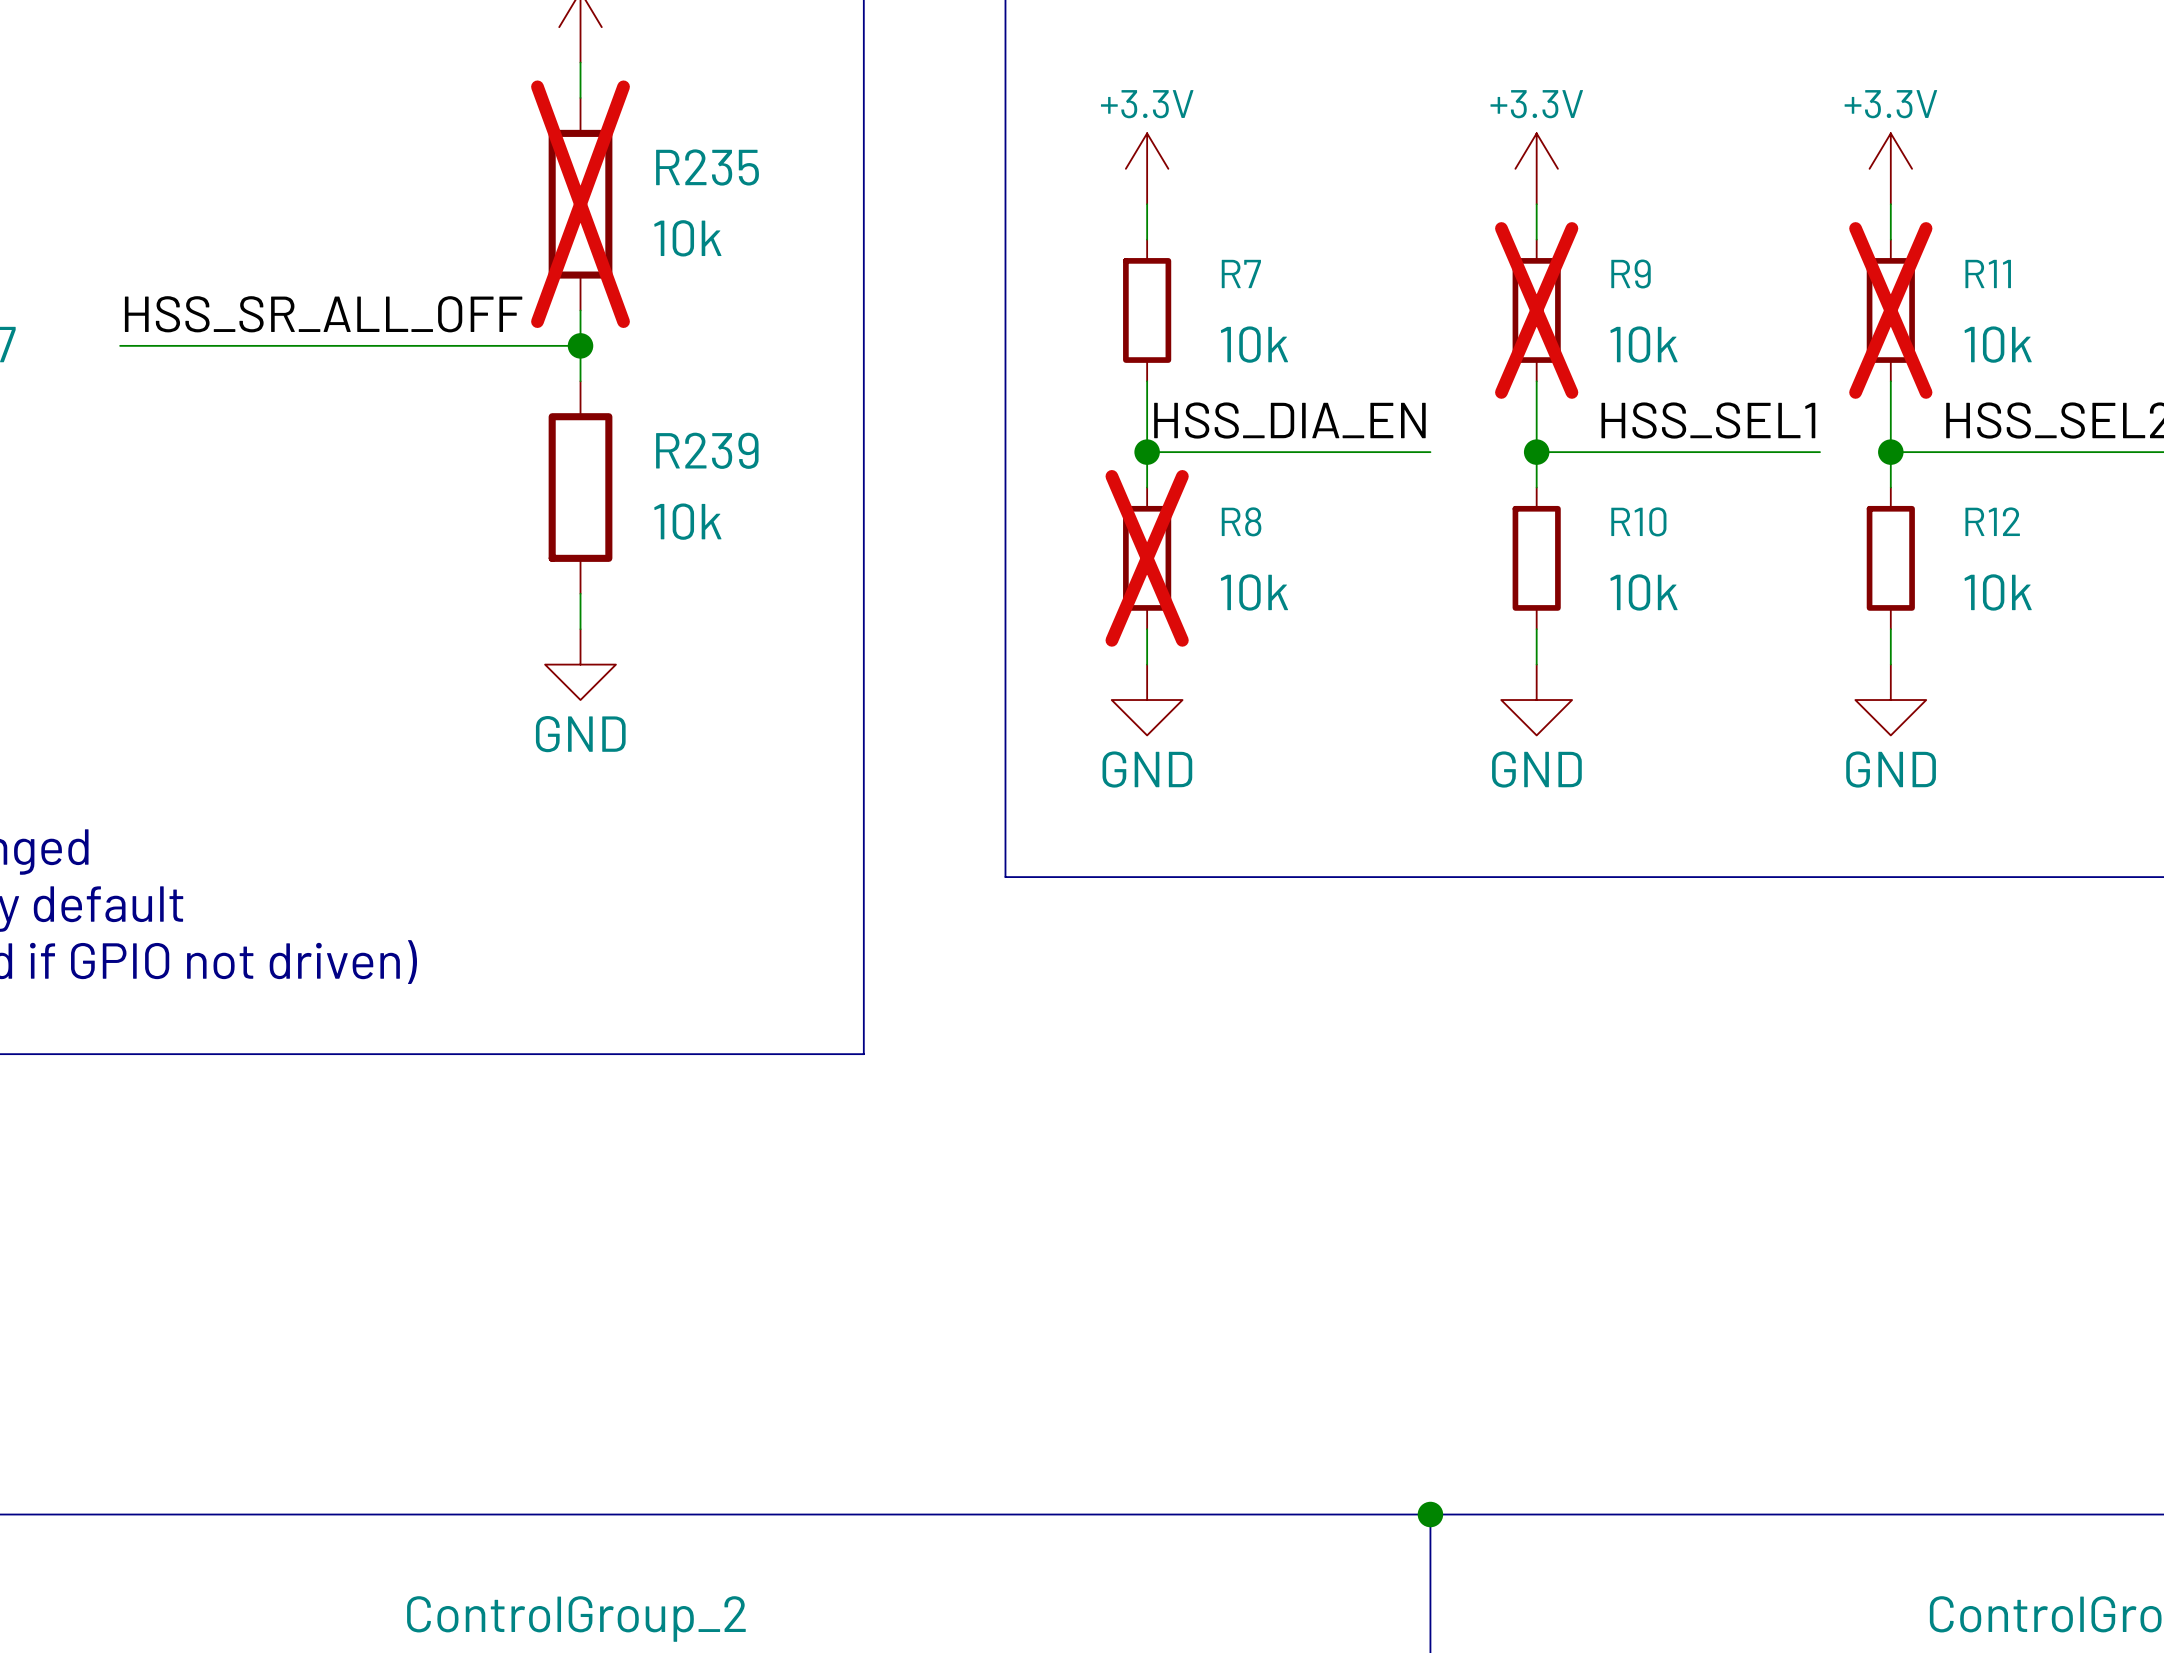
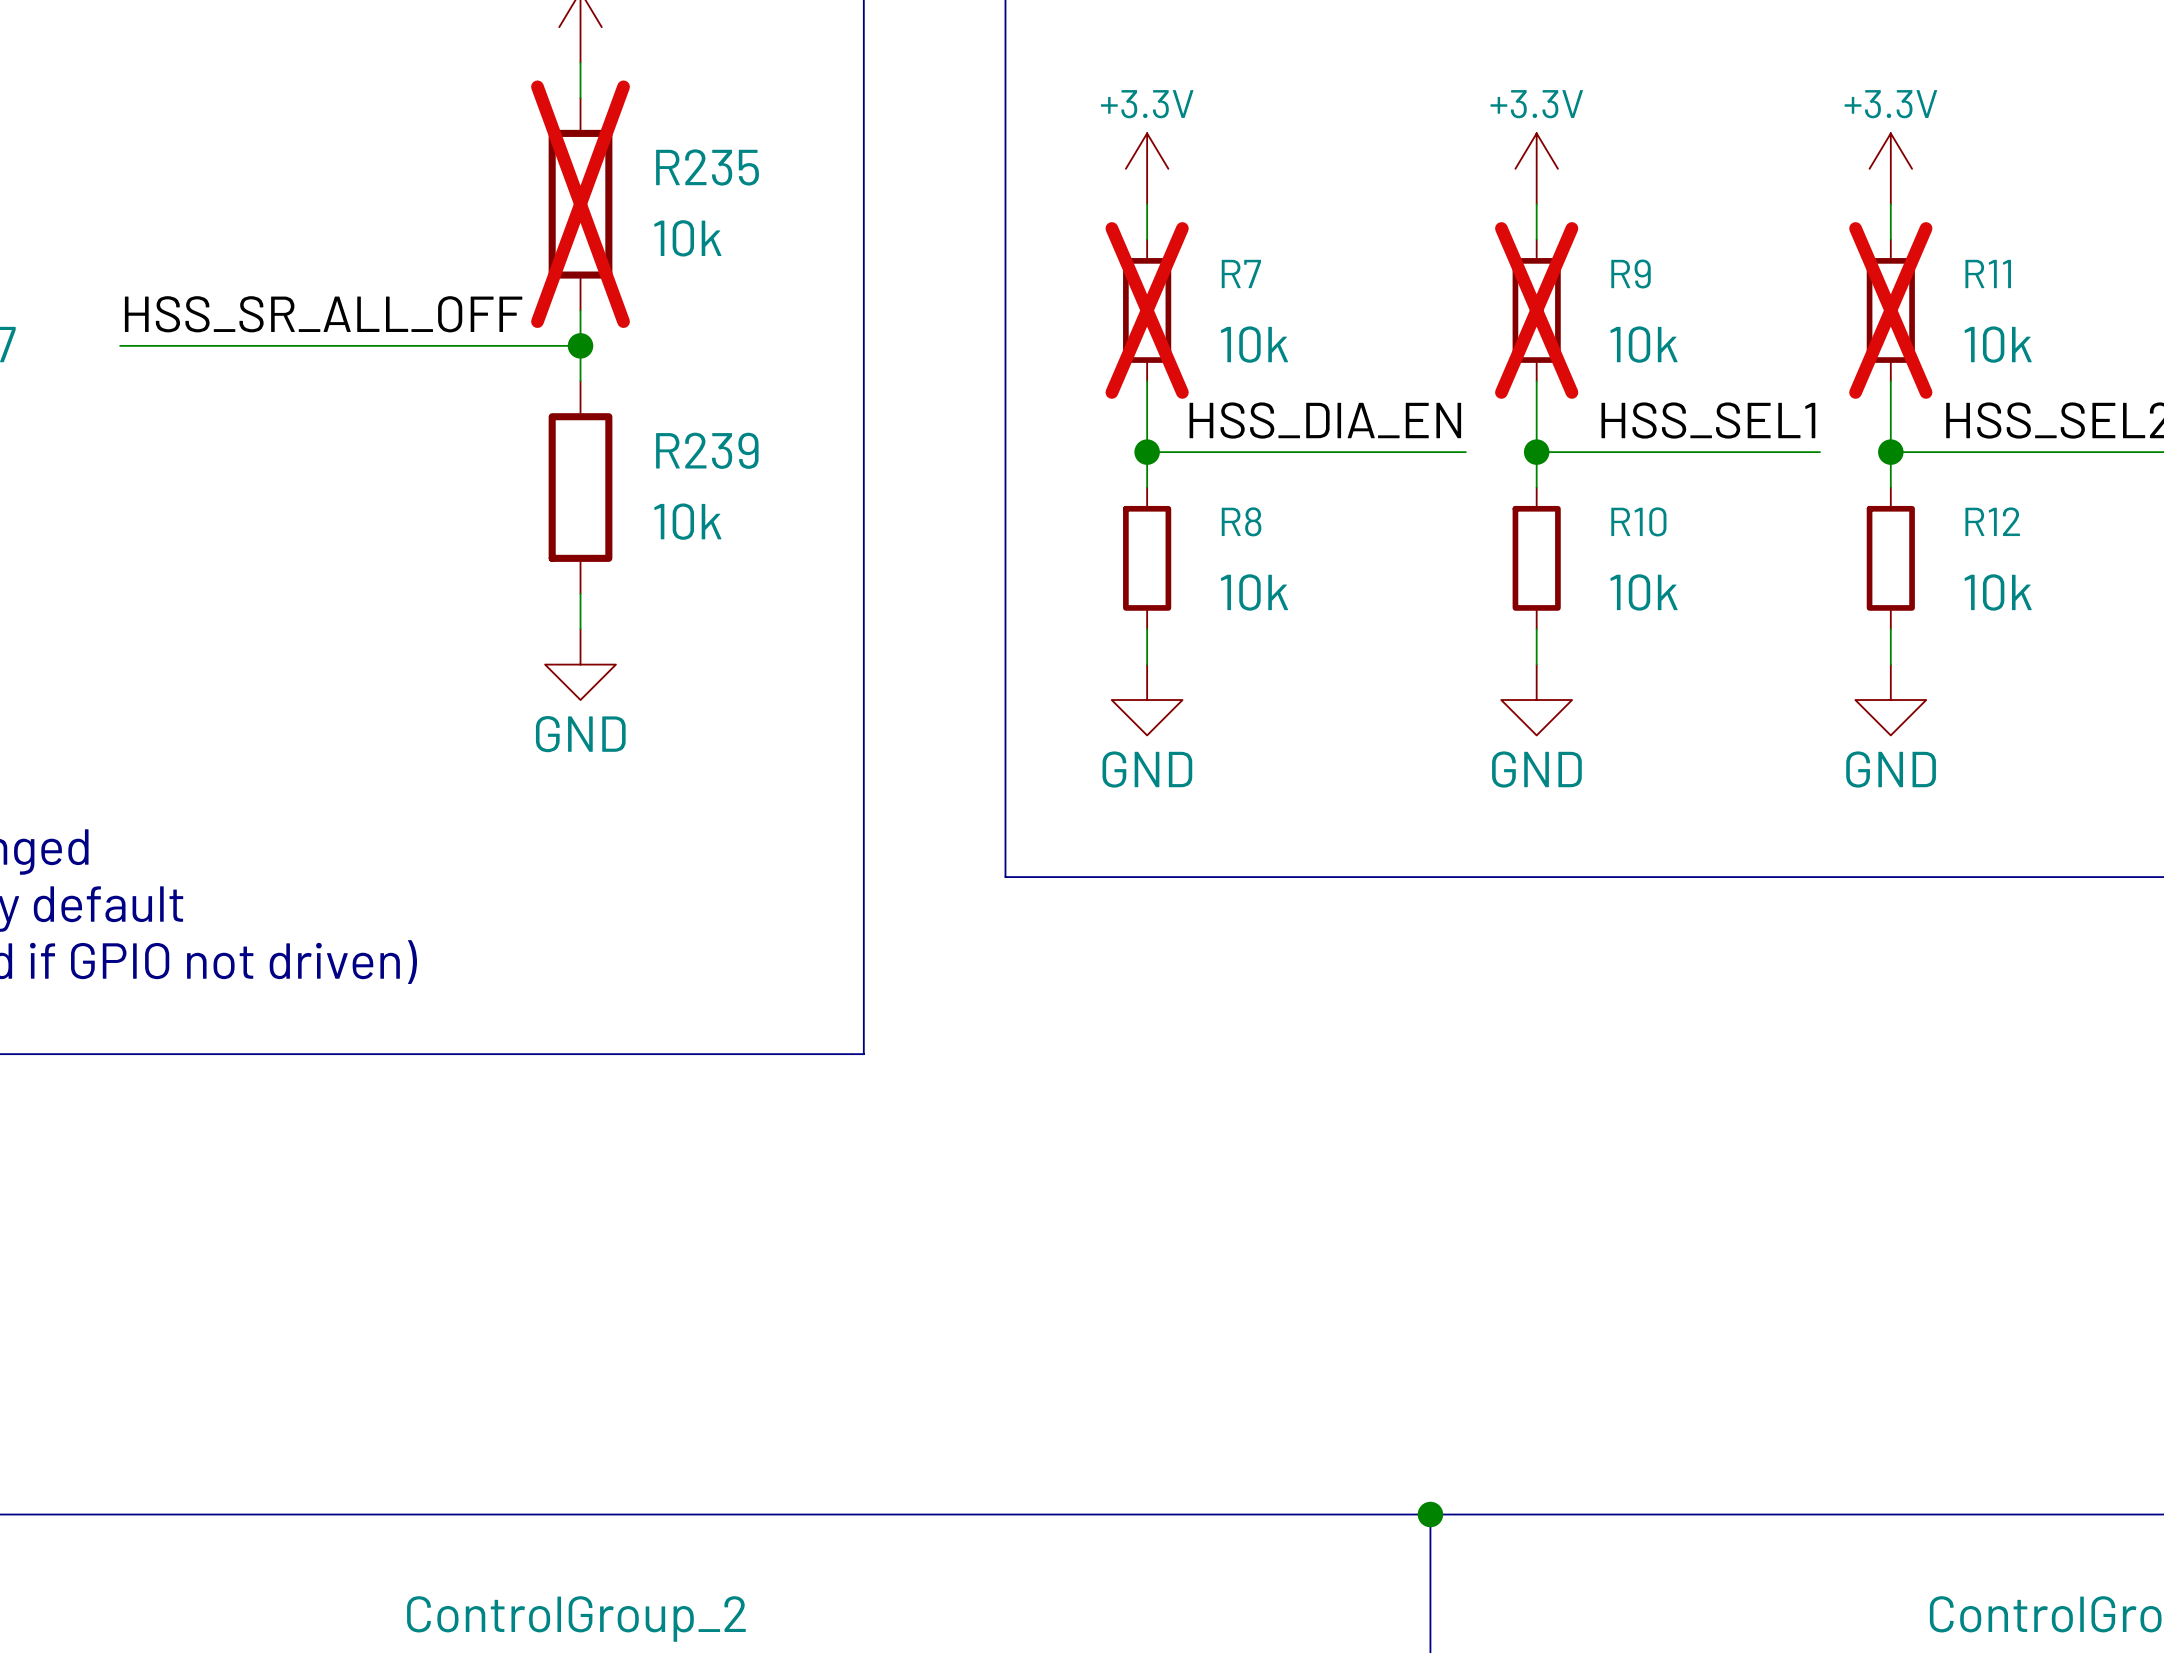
R7 do-not-place cross: none -> (1147, 310)
label position: HSS_DIA_EN (1289, 420) -> HSS_DIA_EN (1325, 420)
wire: none -> (1430, 452) (1465, 452)
R8 do-not-place cross: (1147, 558) -> none

